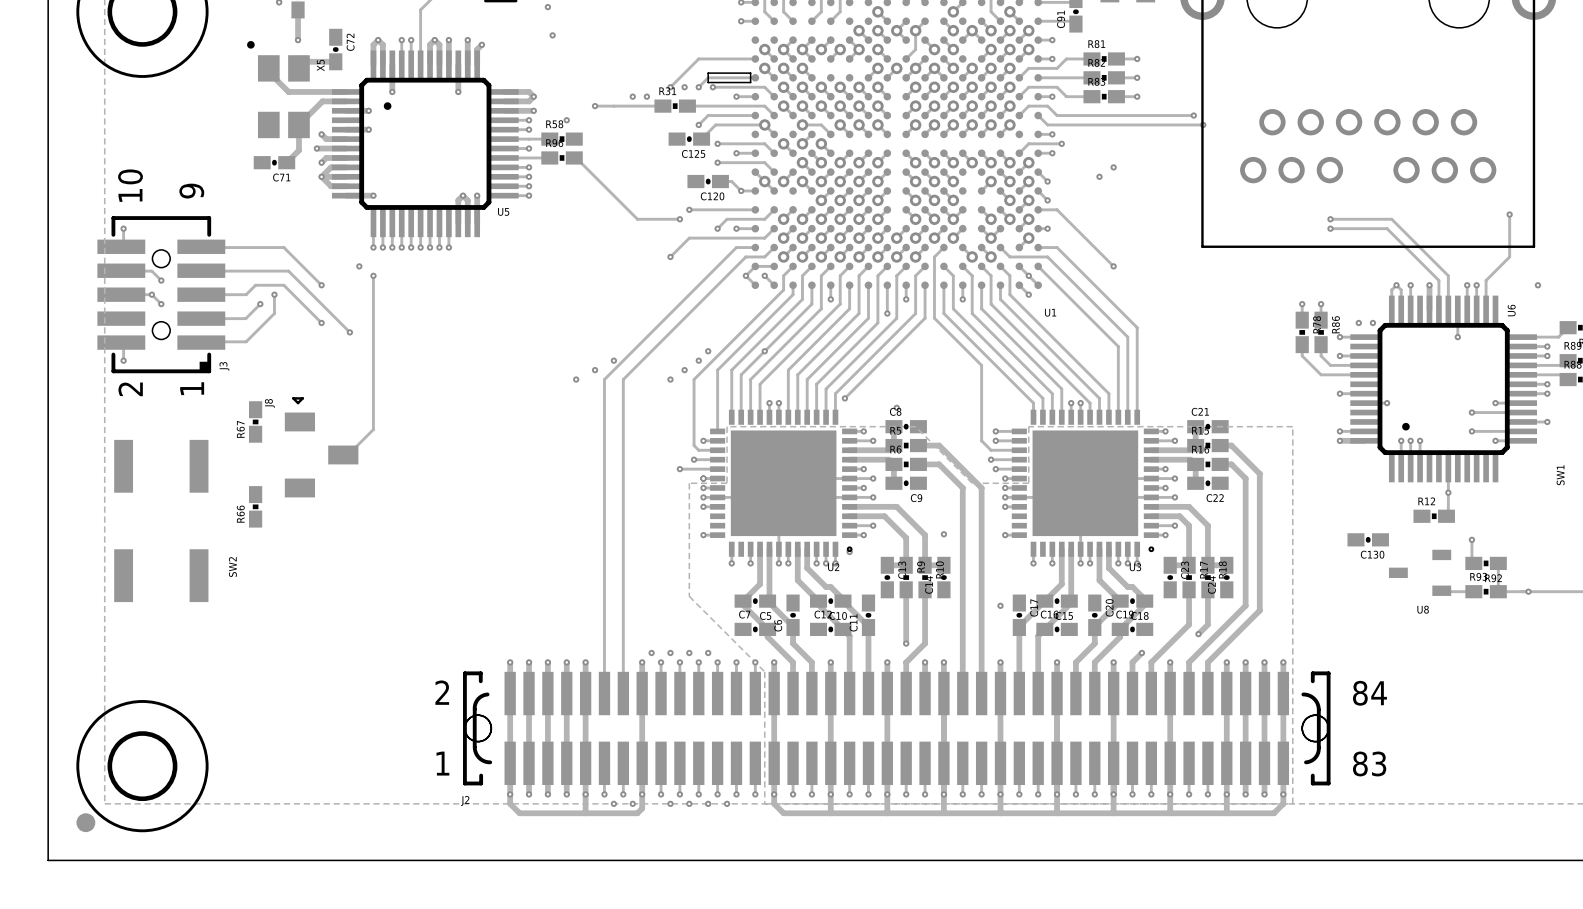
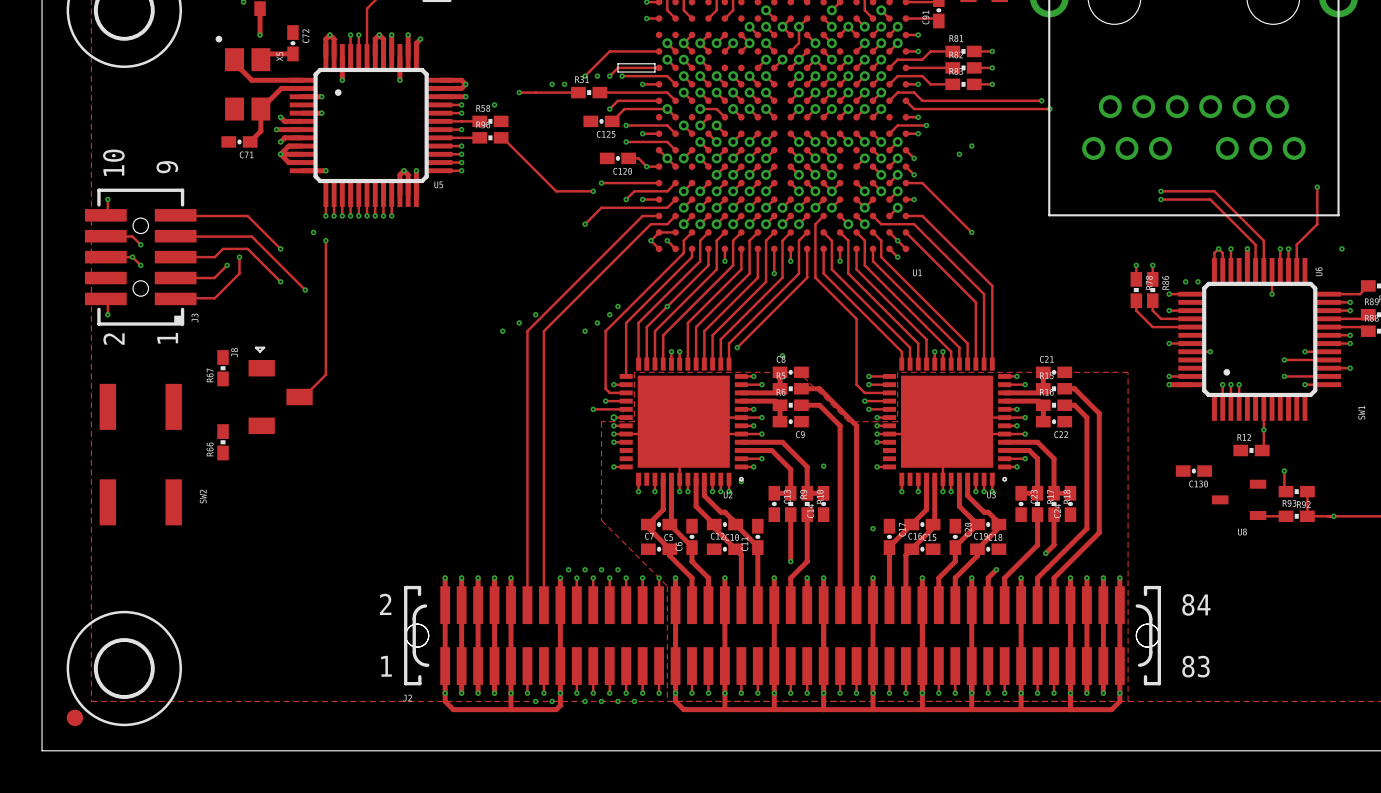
via: (547, 7) -> none
via: (552, 35) -> none
via: none -> (613, 417)

